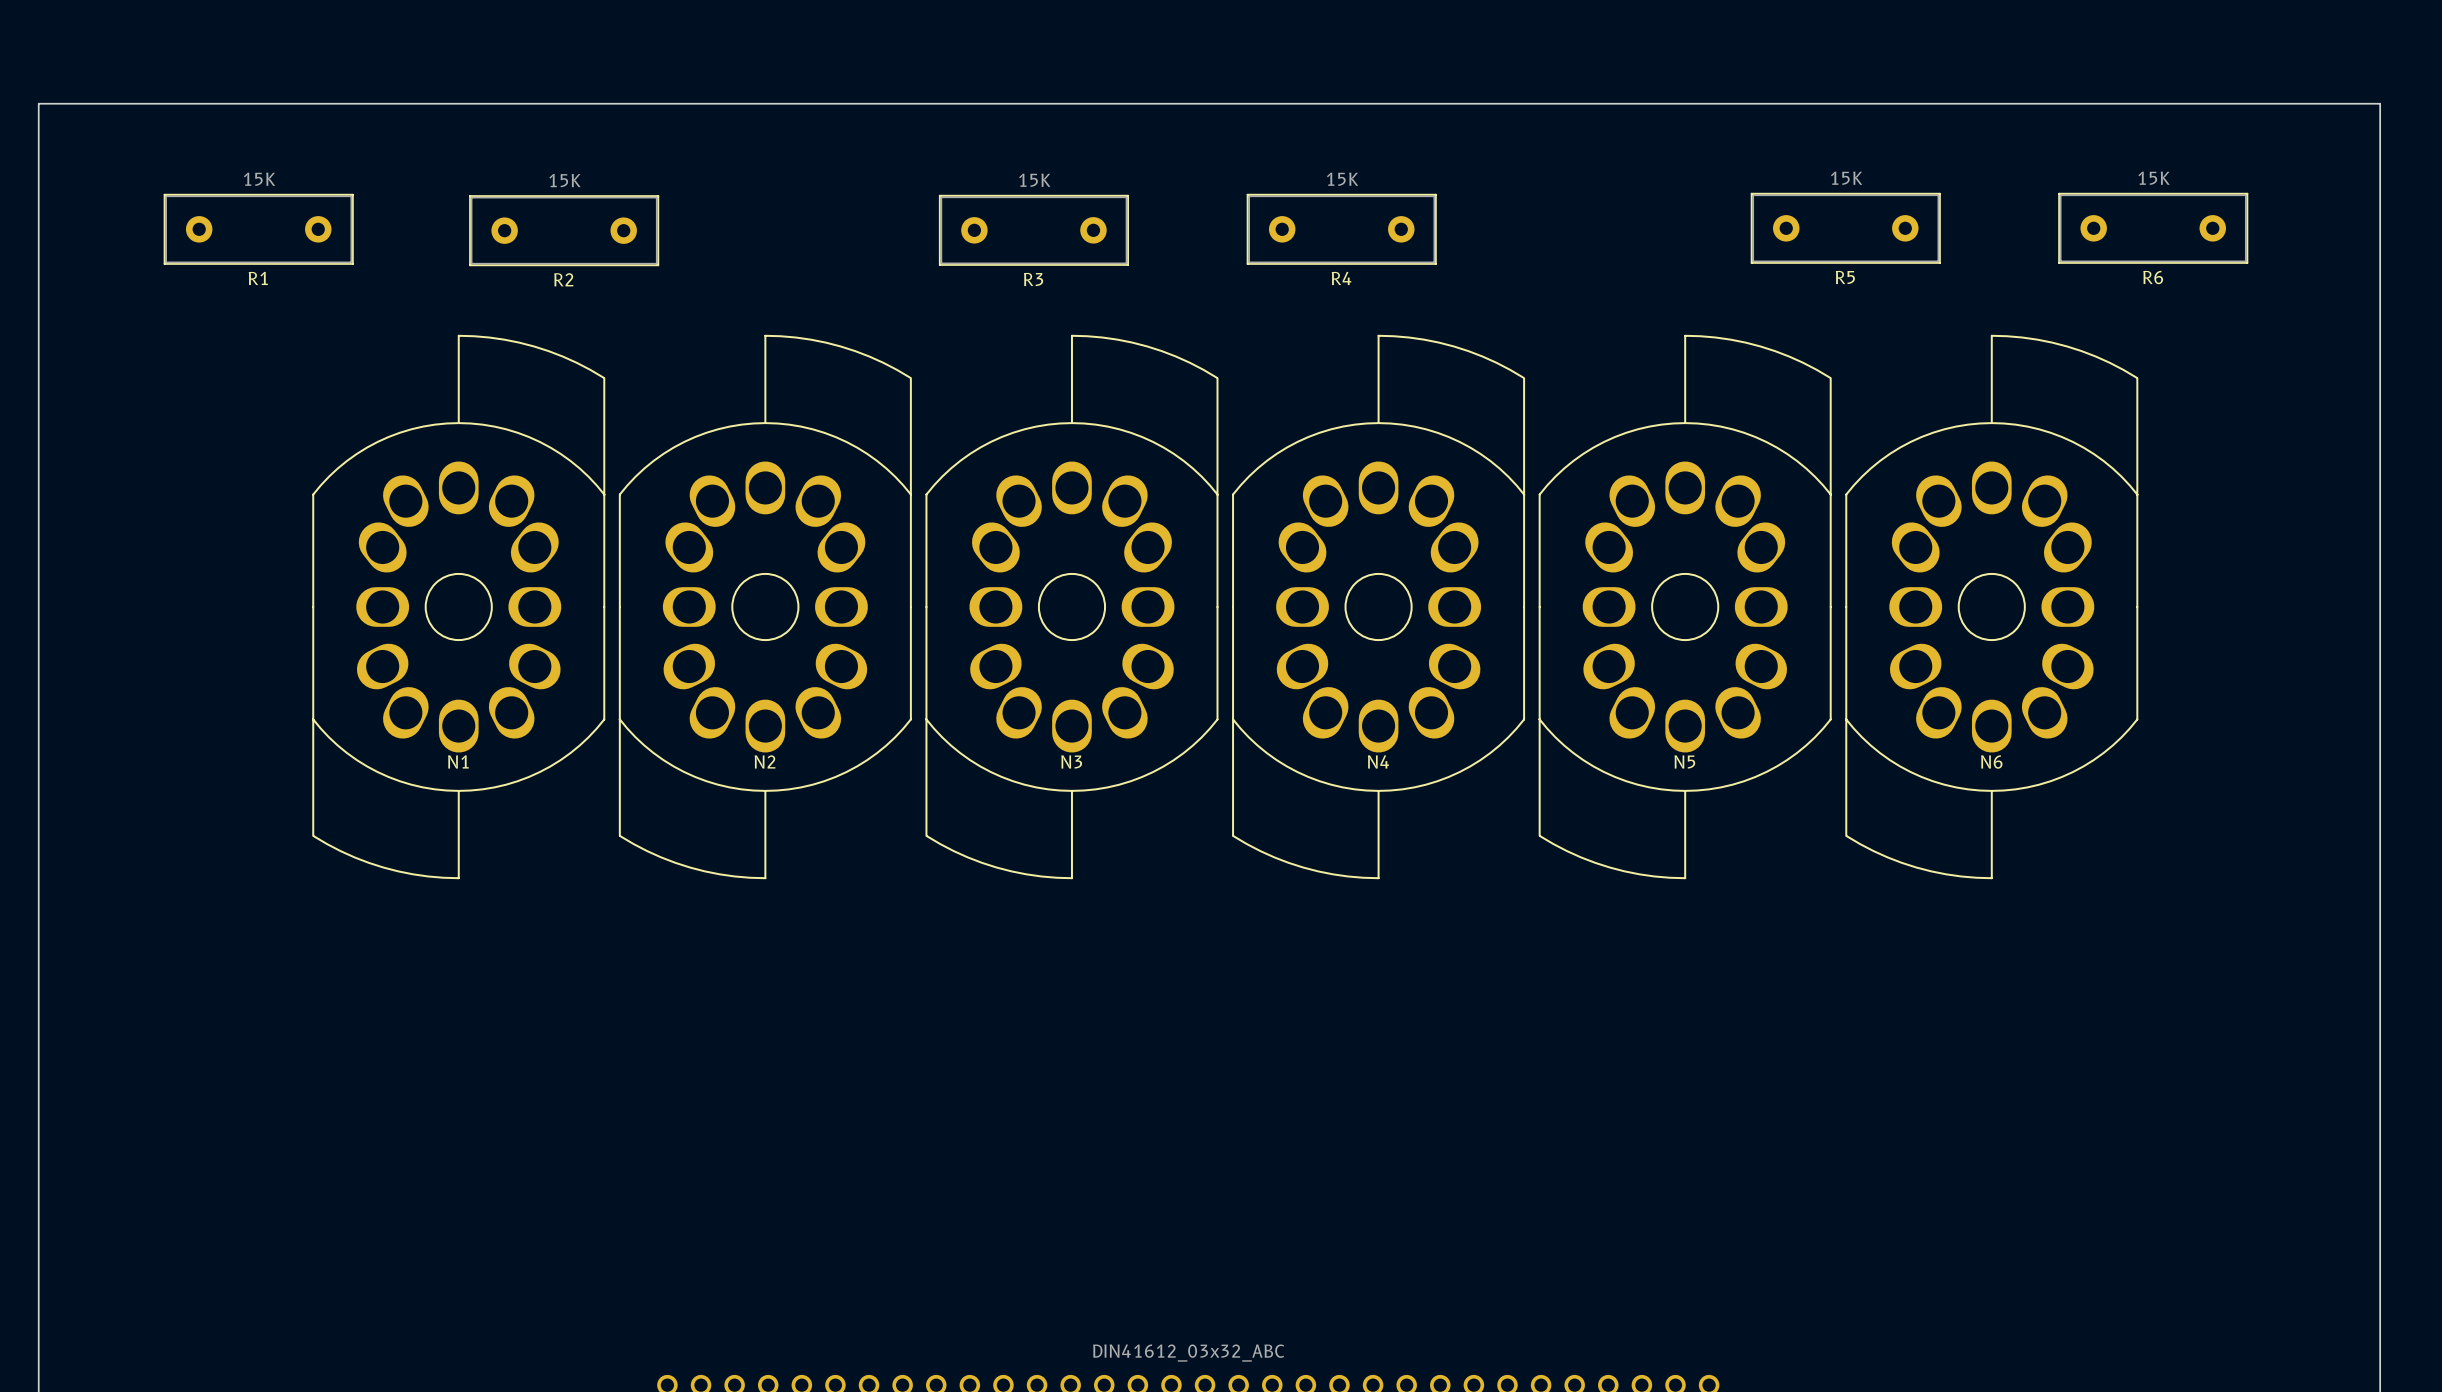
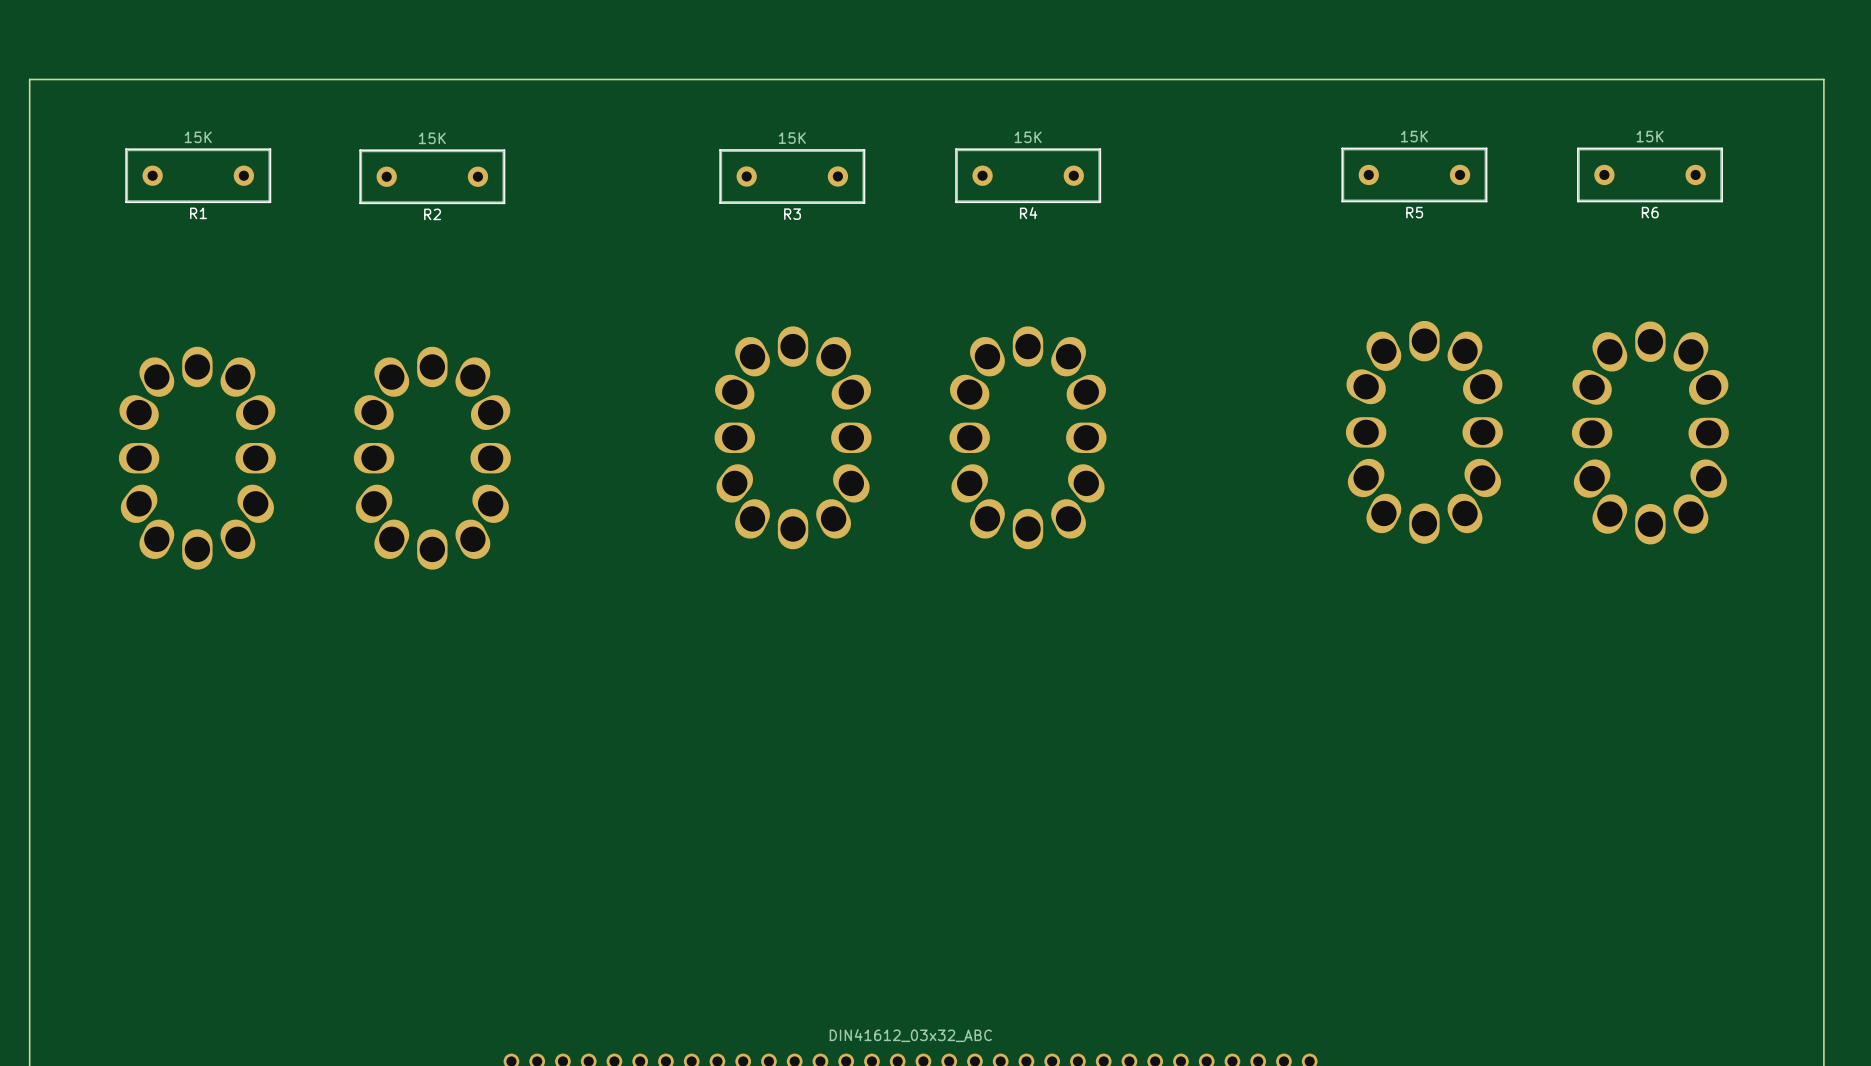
N1 side: top (458, 606) -> bottom (197, 458)
N2 side: top (765, 606) -> bottom (432, 458)
N3 side: top (1071, 606) -> bottom (793, 437)
N4 side: top (1378, 606) -> bottom (1028, 437)
N5 side: top (1685, 606) -> bottom (1424, 432)
N6 side: top (1991, 606) -> bottom (1650, 432)

